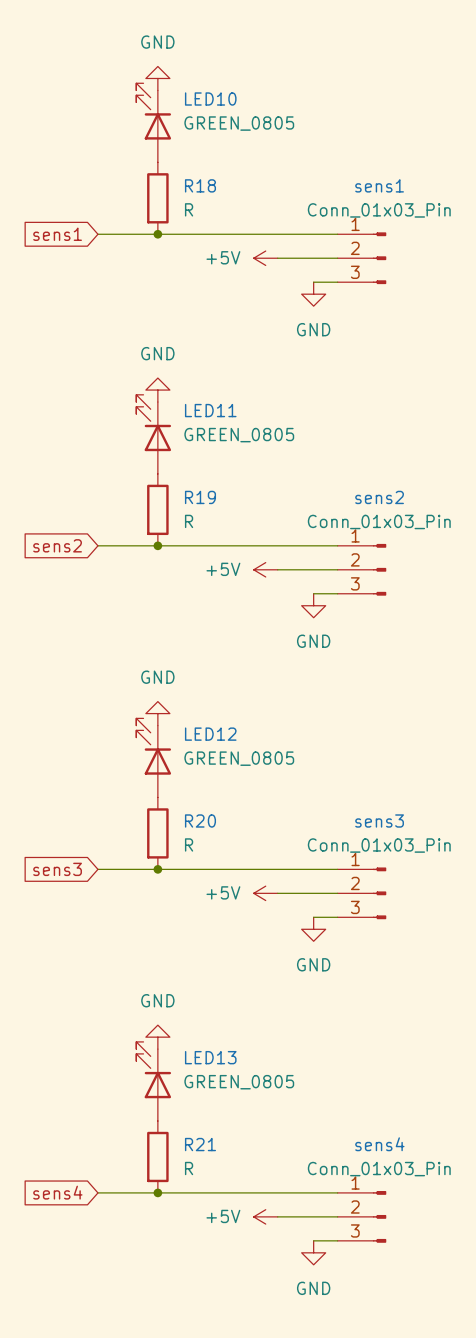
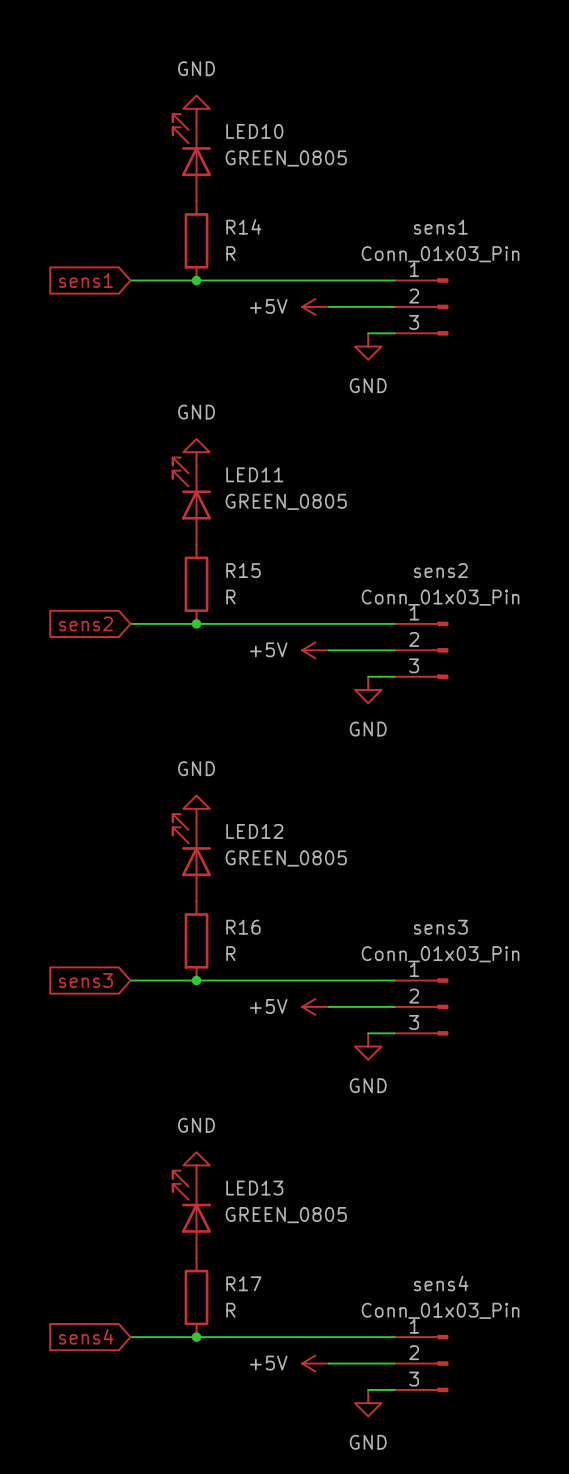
R18 name: R18 (200, 185) -> R14 (243, 226)
R19 name: R19 (200, 497) -> R15 (243, 570)
R20 name: R20 (200, 820) -> R16 (243, 927)
R21 name: R21 (200, 1144) -> R17 (243, 1283)

